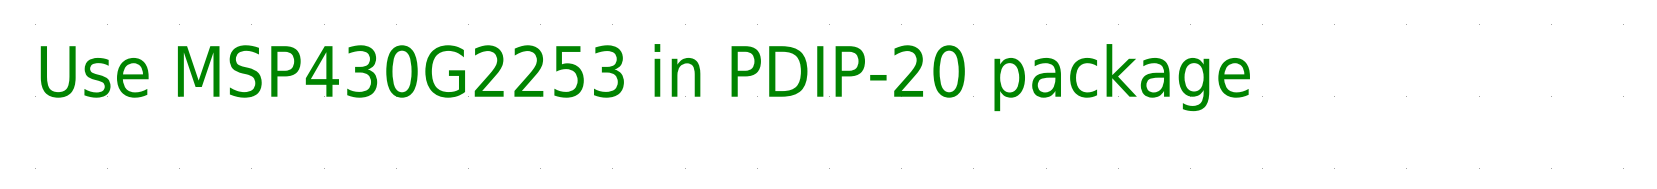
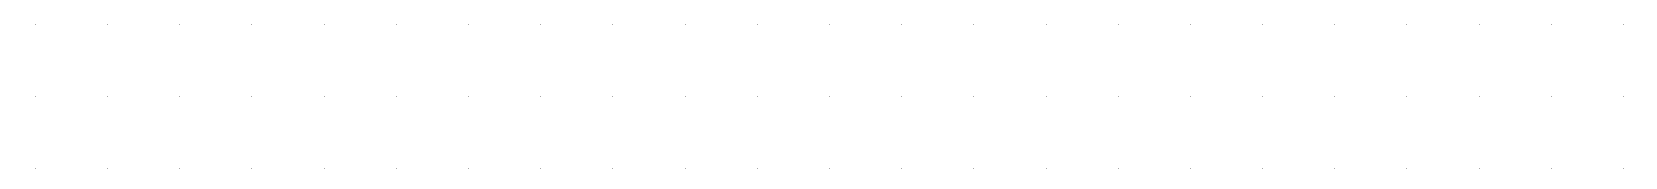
text: Use MSP430G2253 in PDIP-20 package (645, 77) -> none

